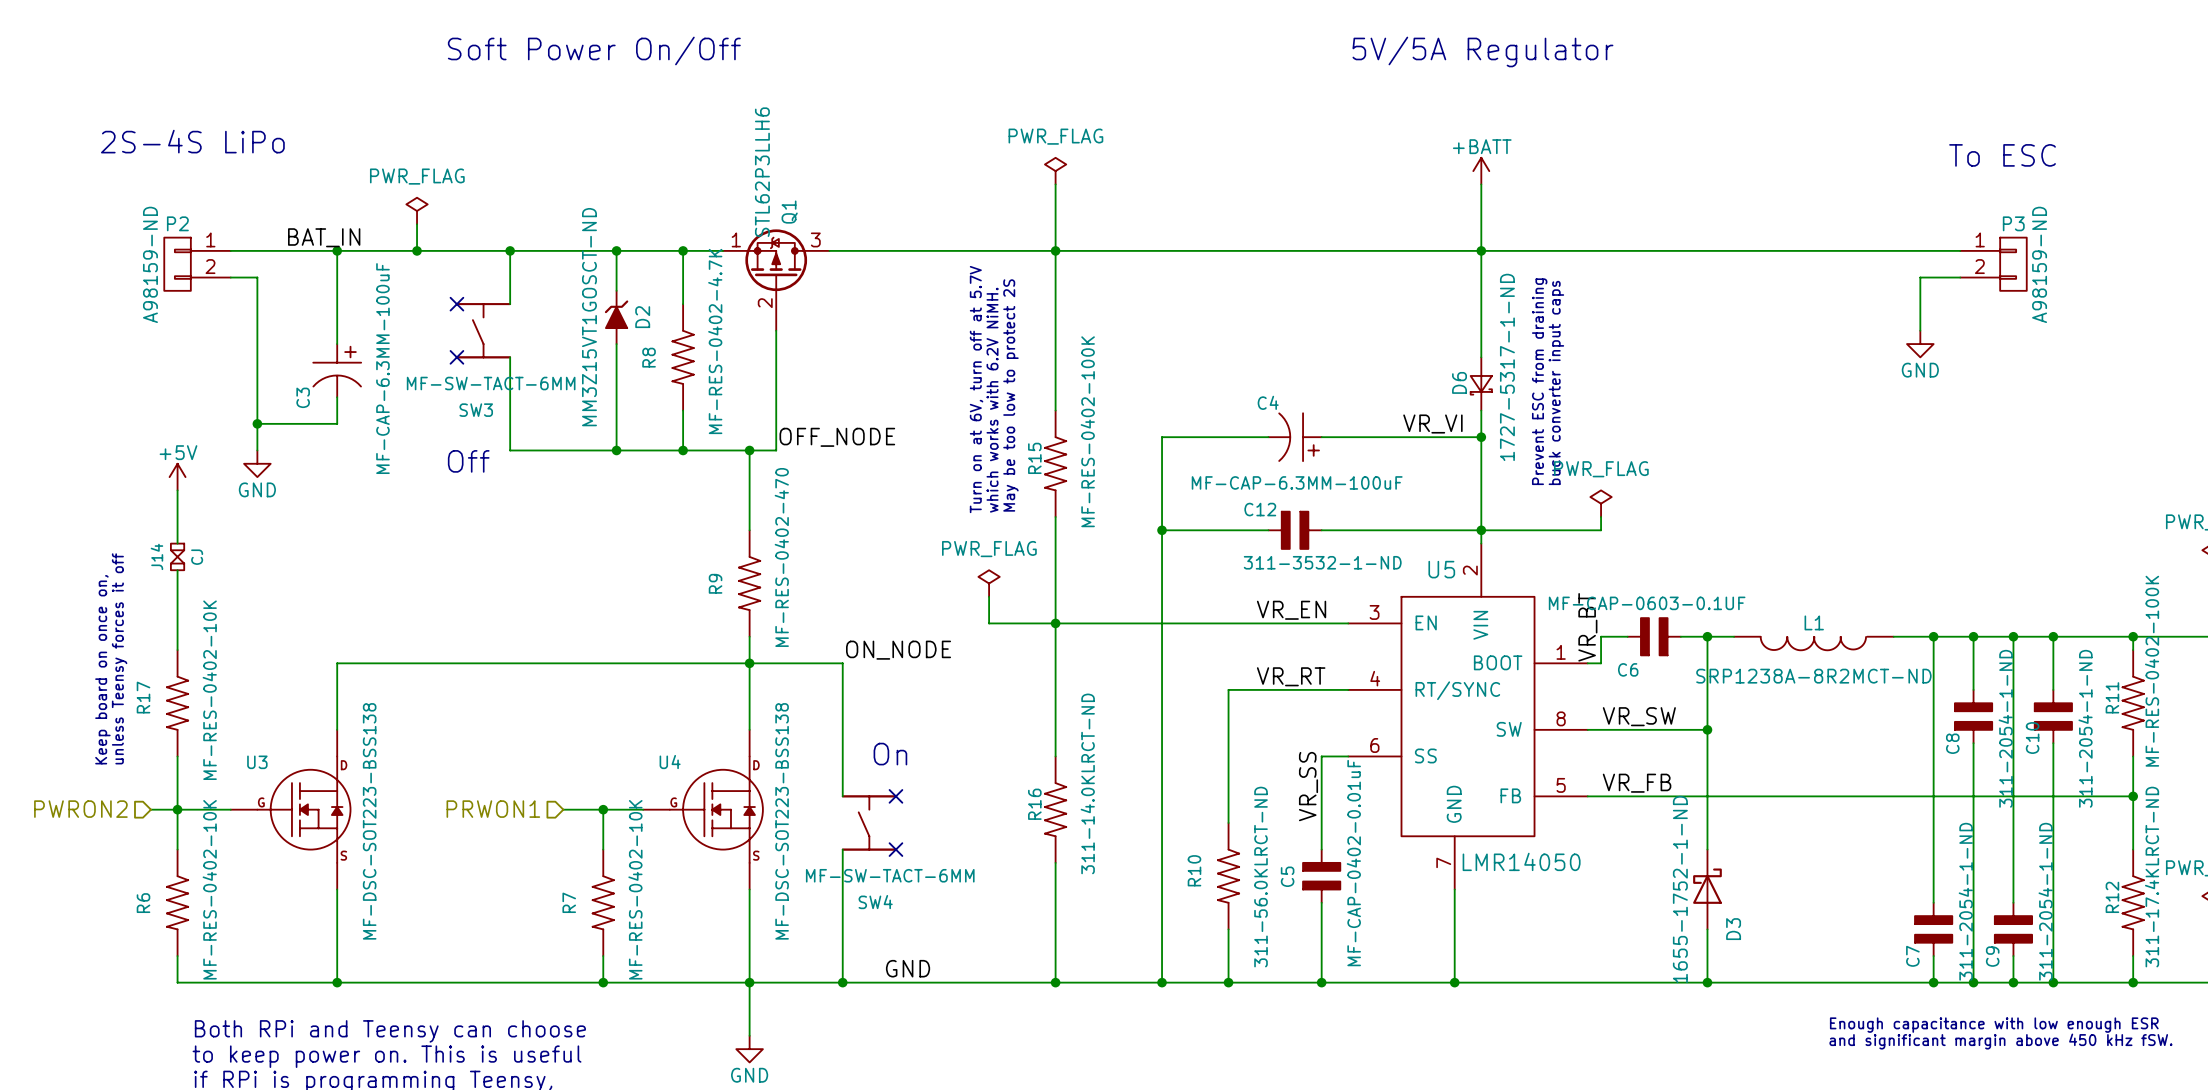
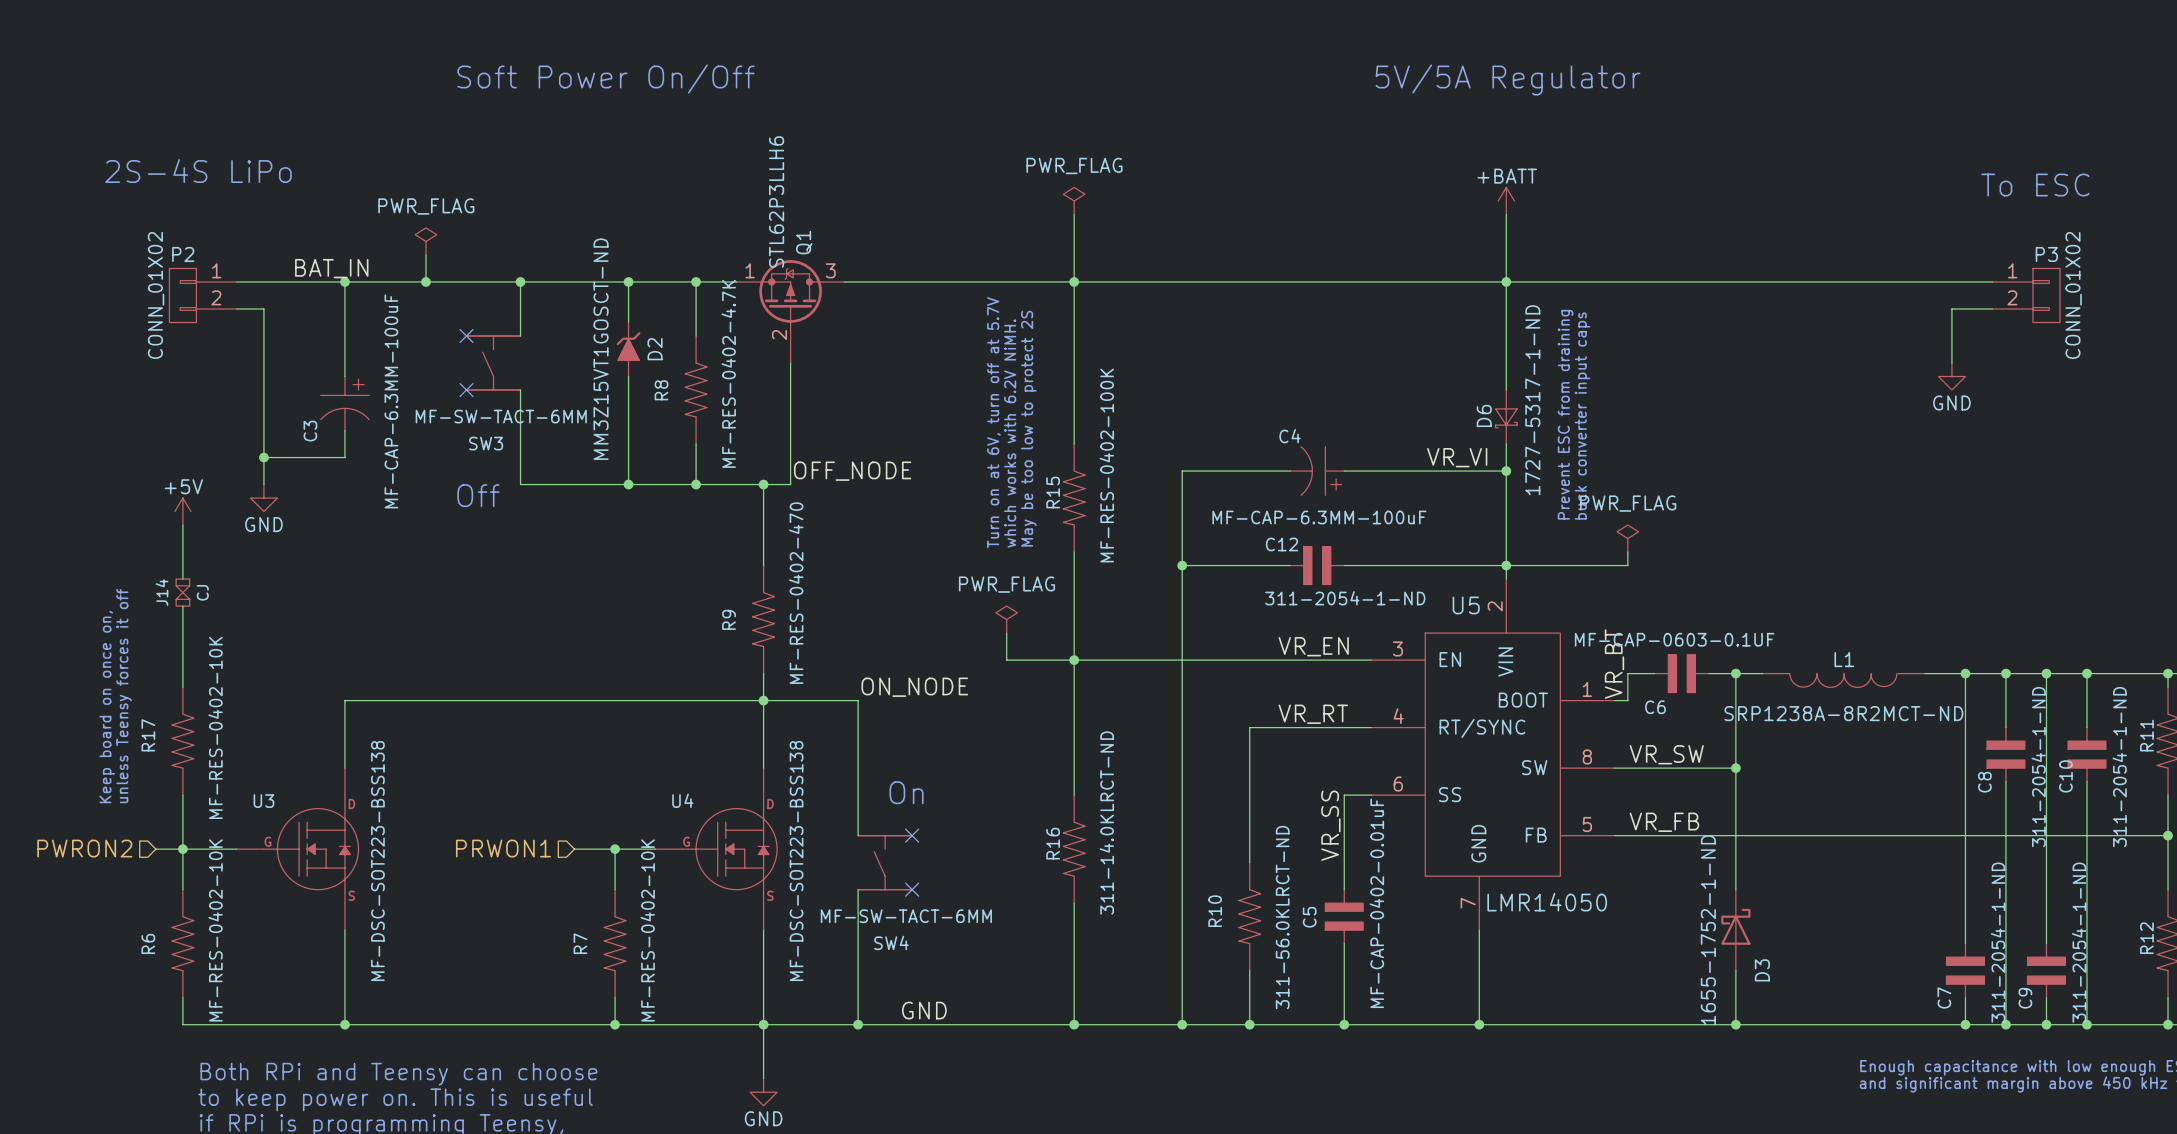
P2 value: A98159-ND (150, 264) -> CONN_01X02 (156, 295)
P3 value: A98159-ND (2039, 264) -> CONN_01X02 (2073, 295)
C12 value: 311-3532-1-ND (1322, 562) -> 311-2054-1-ND (1345, 598)

